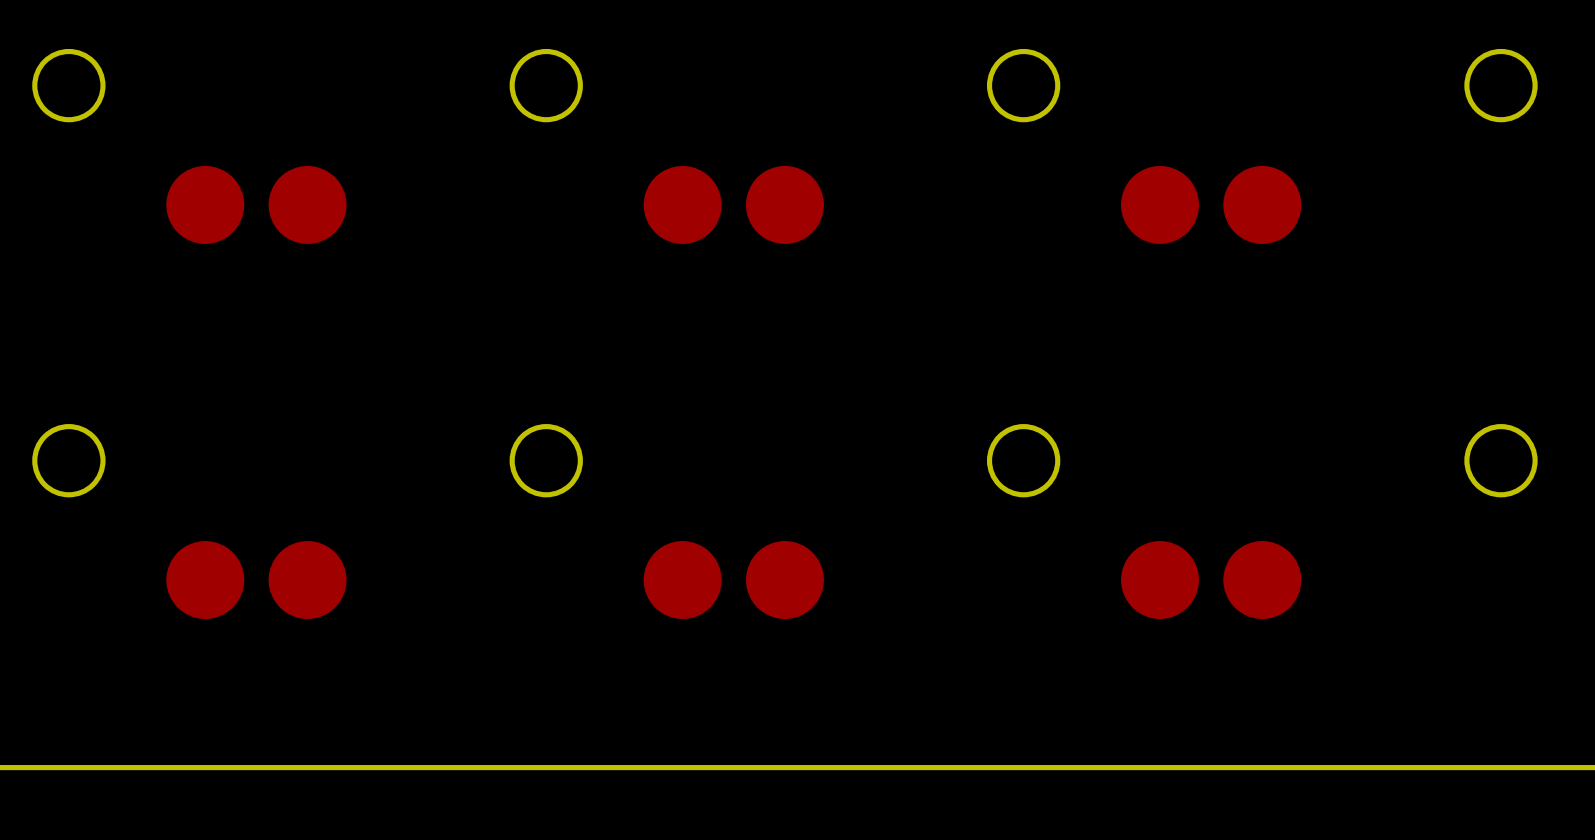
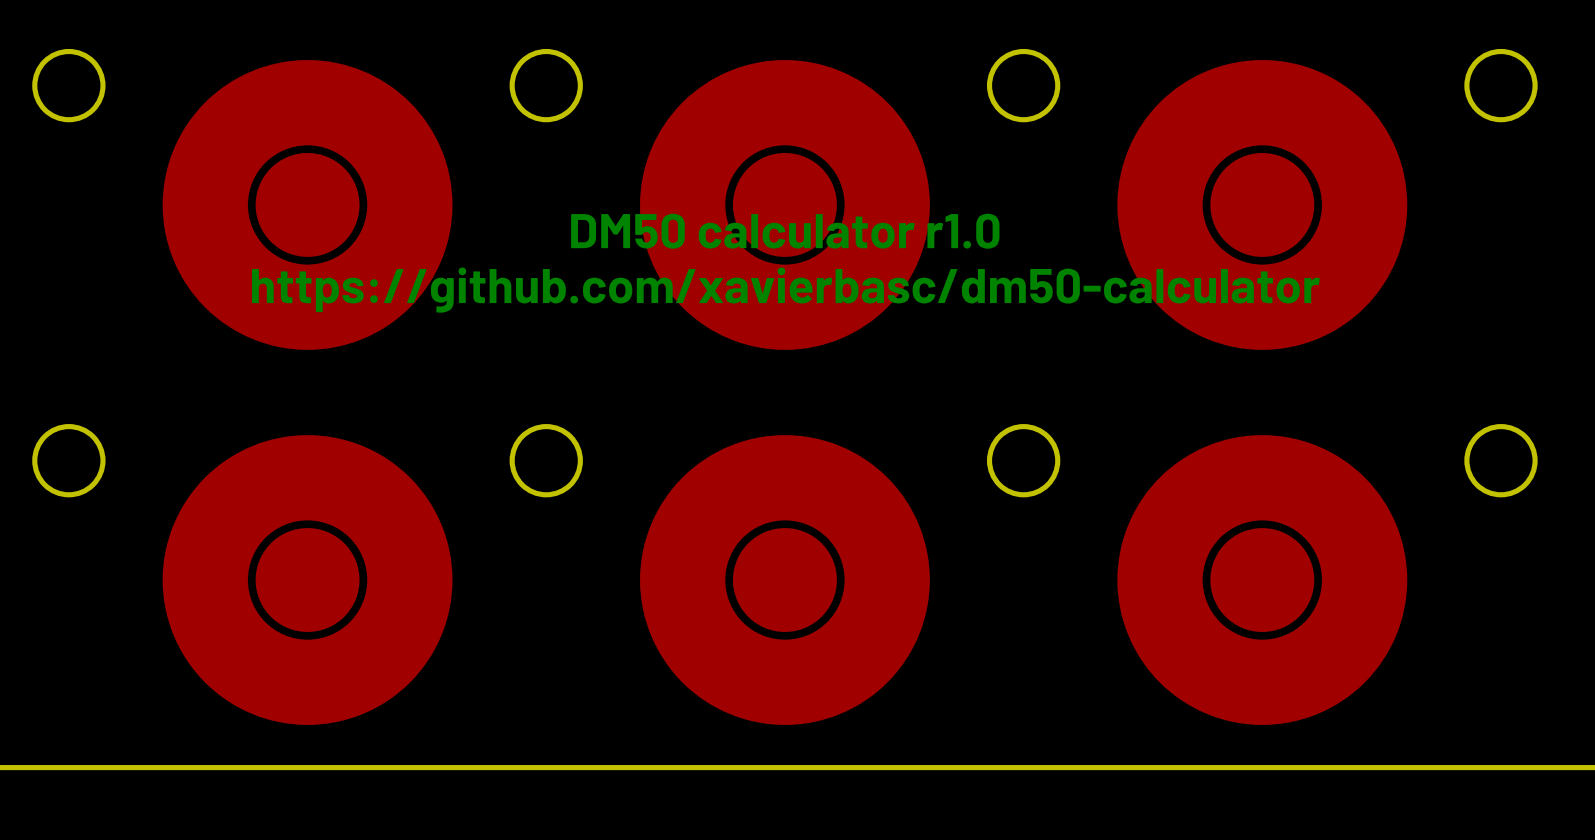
part: (256, 204) -> none
part: none -> (307, 204)
part: (733, 204) -> none
part: none -> (784, 204)
part: (1211, 204) -> none
part: none -> (1262, 204)
text: none -> DM50 calculator r1.0 (785, 231)
text: none -> https://github.com/xavierbasc/dm50-calculator (785, 290)
part: (256, 580) -> none
part: none -> (307, 580)
part: (733, 580) -> none
part: none -> (784, 580)
part: (1211, 580) -> none
part: none -> (1262, 580)

